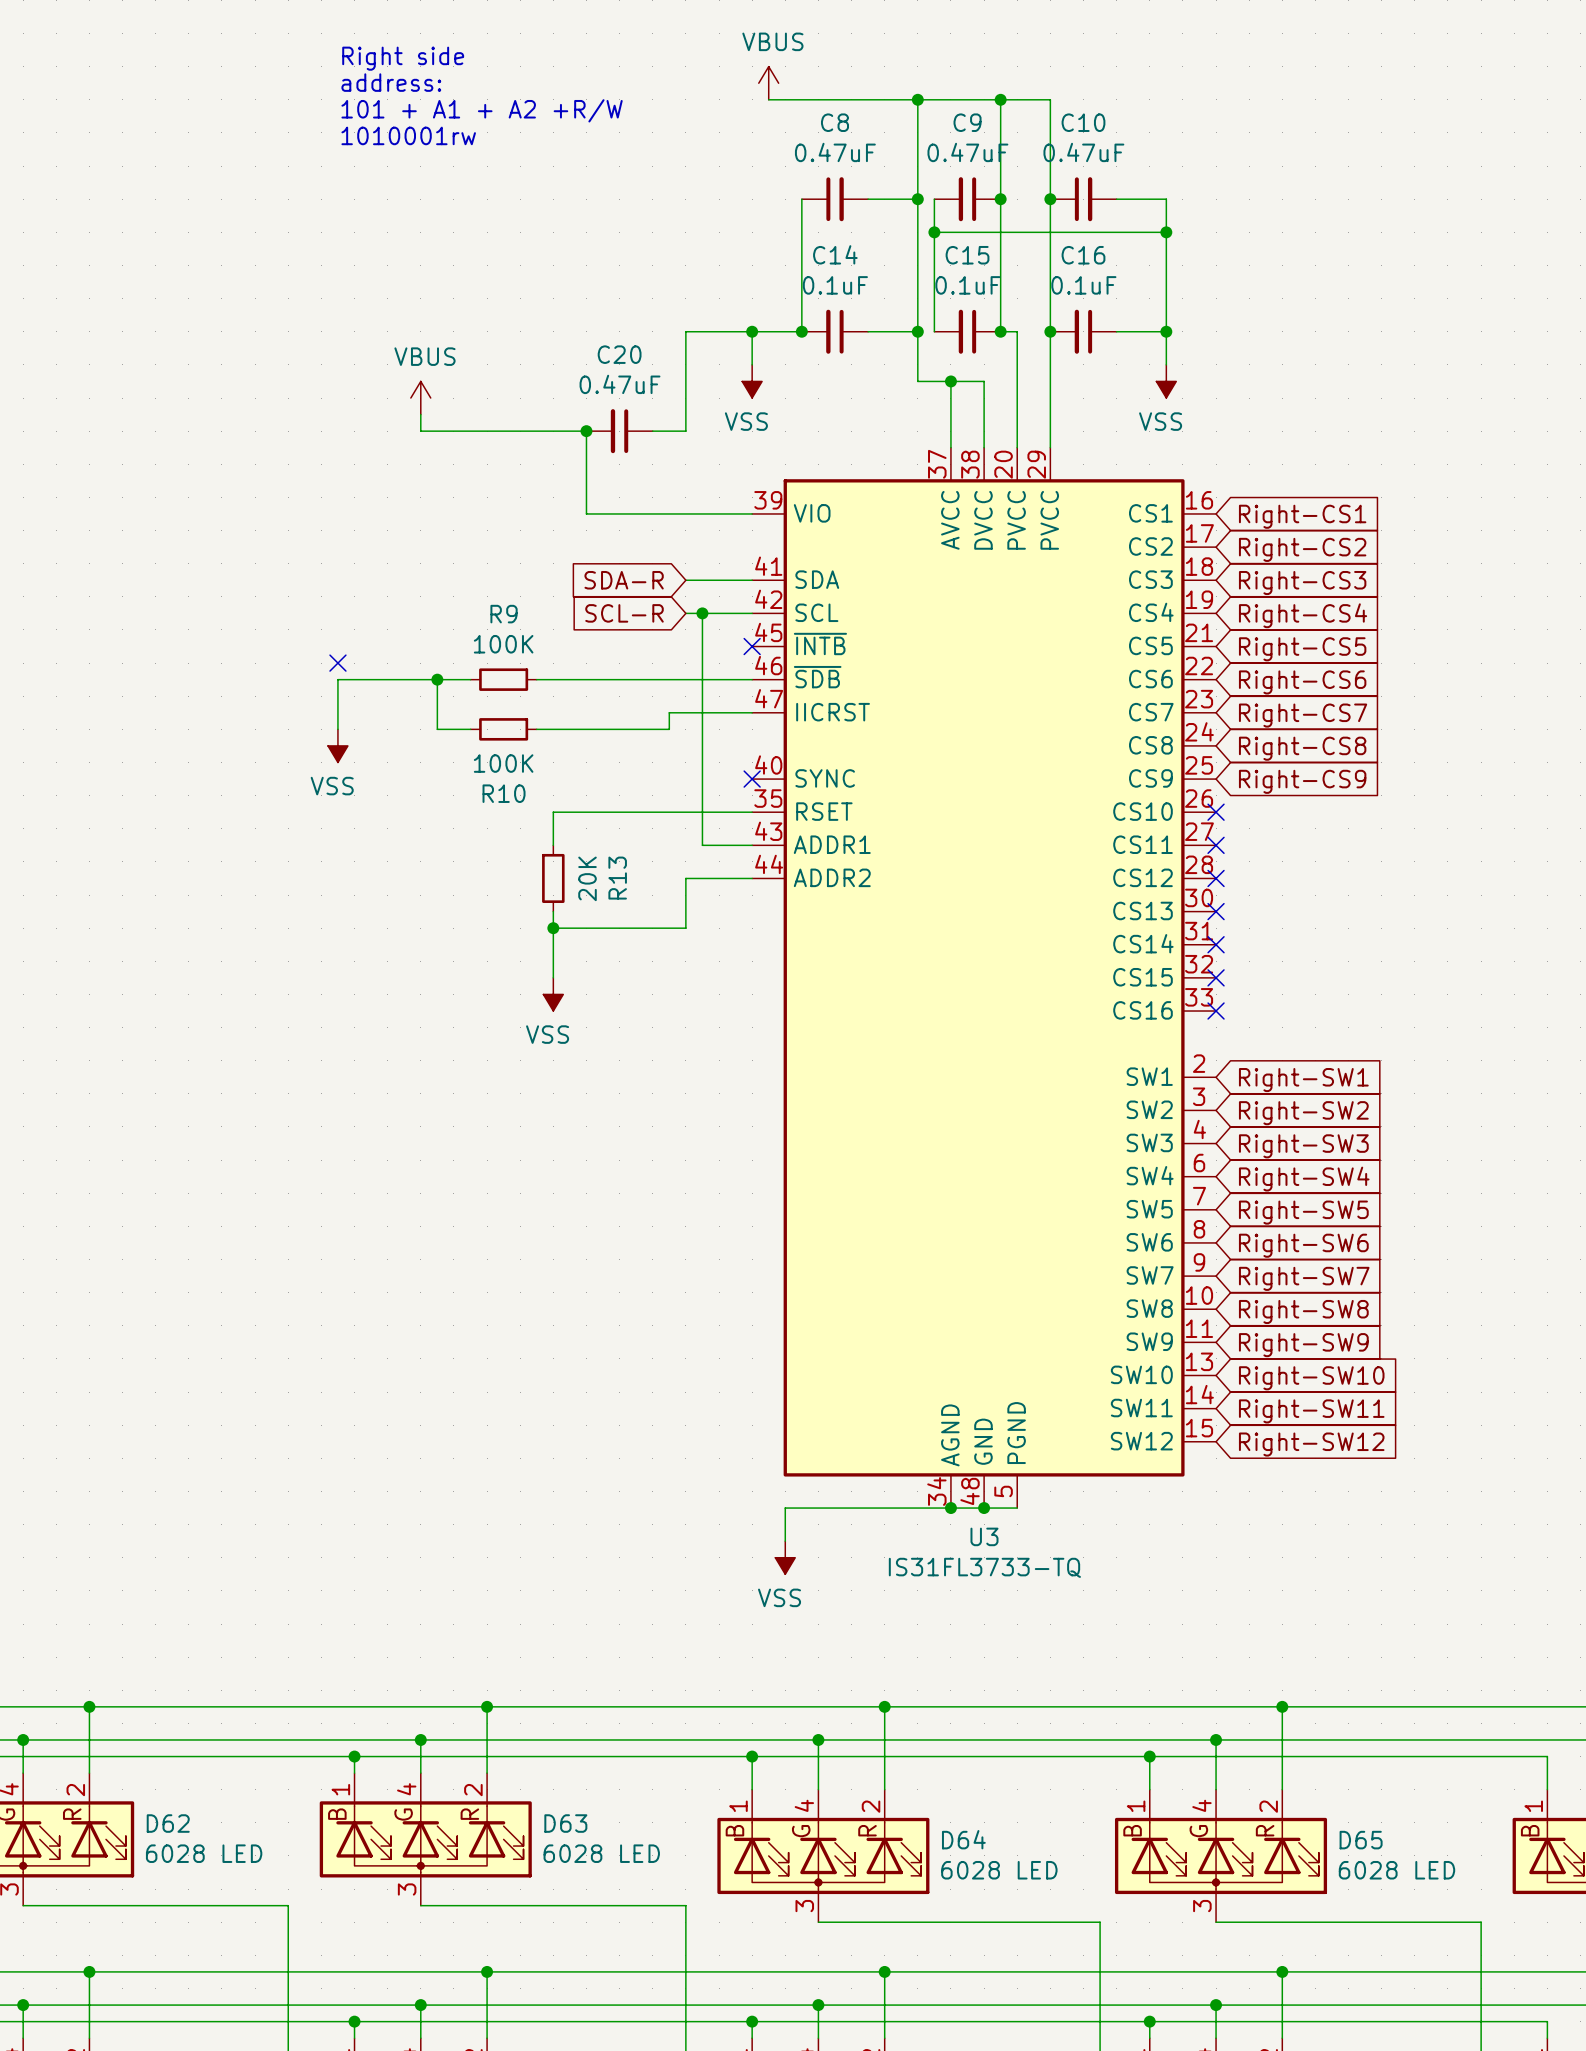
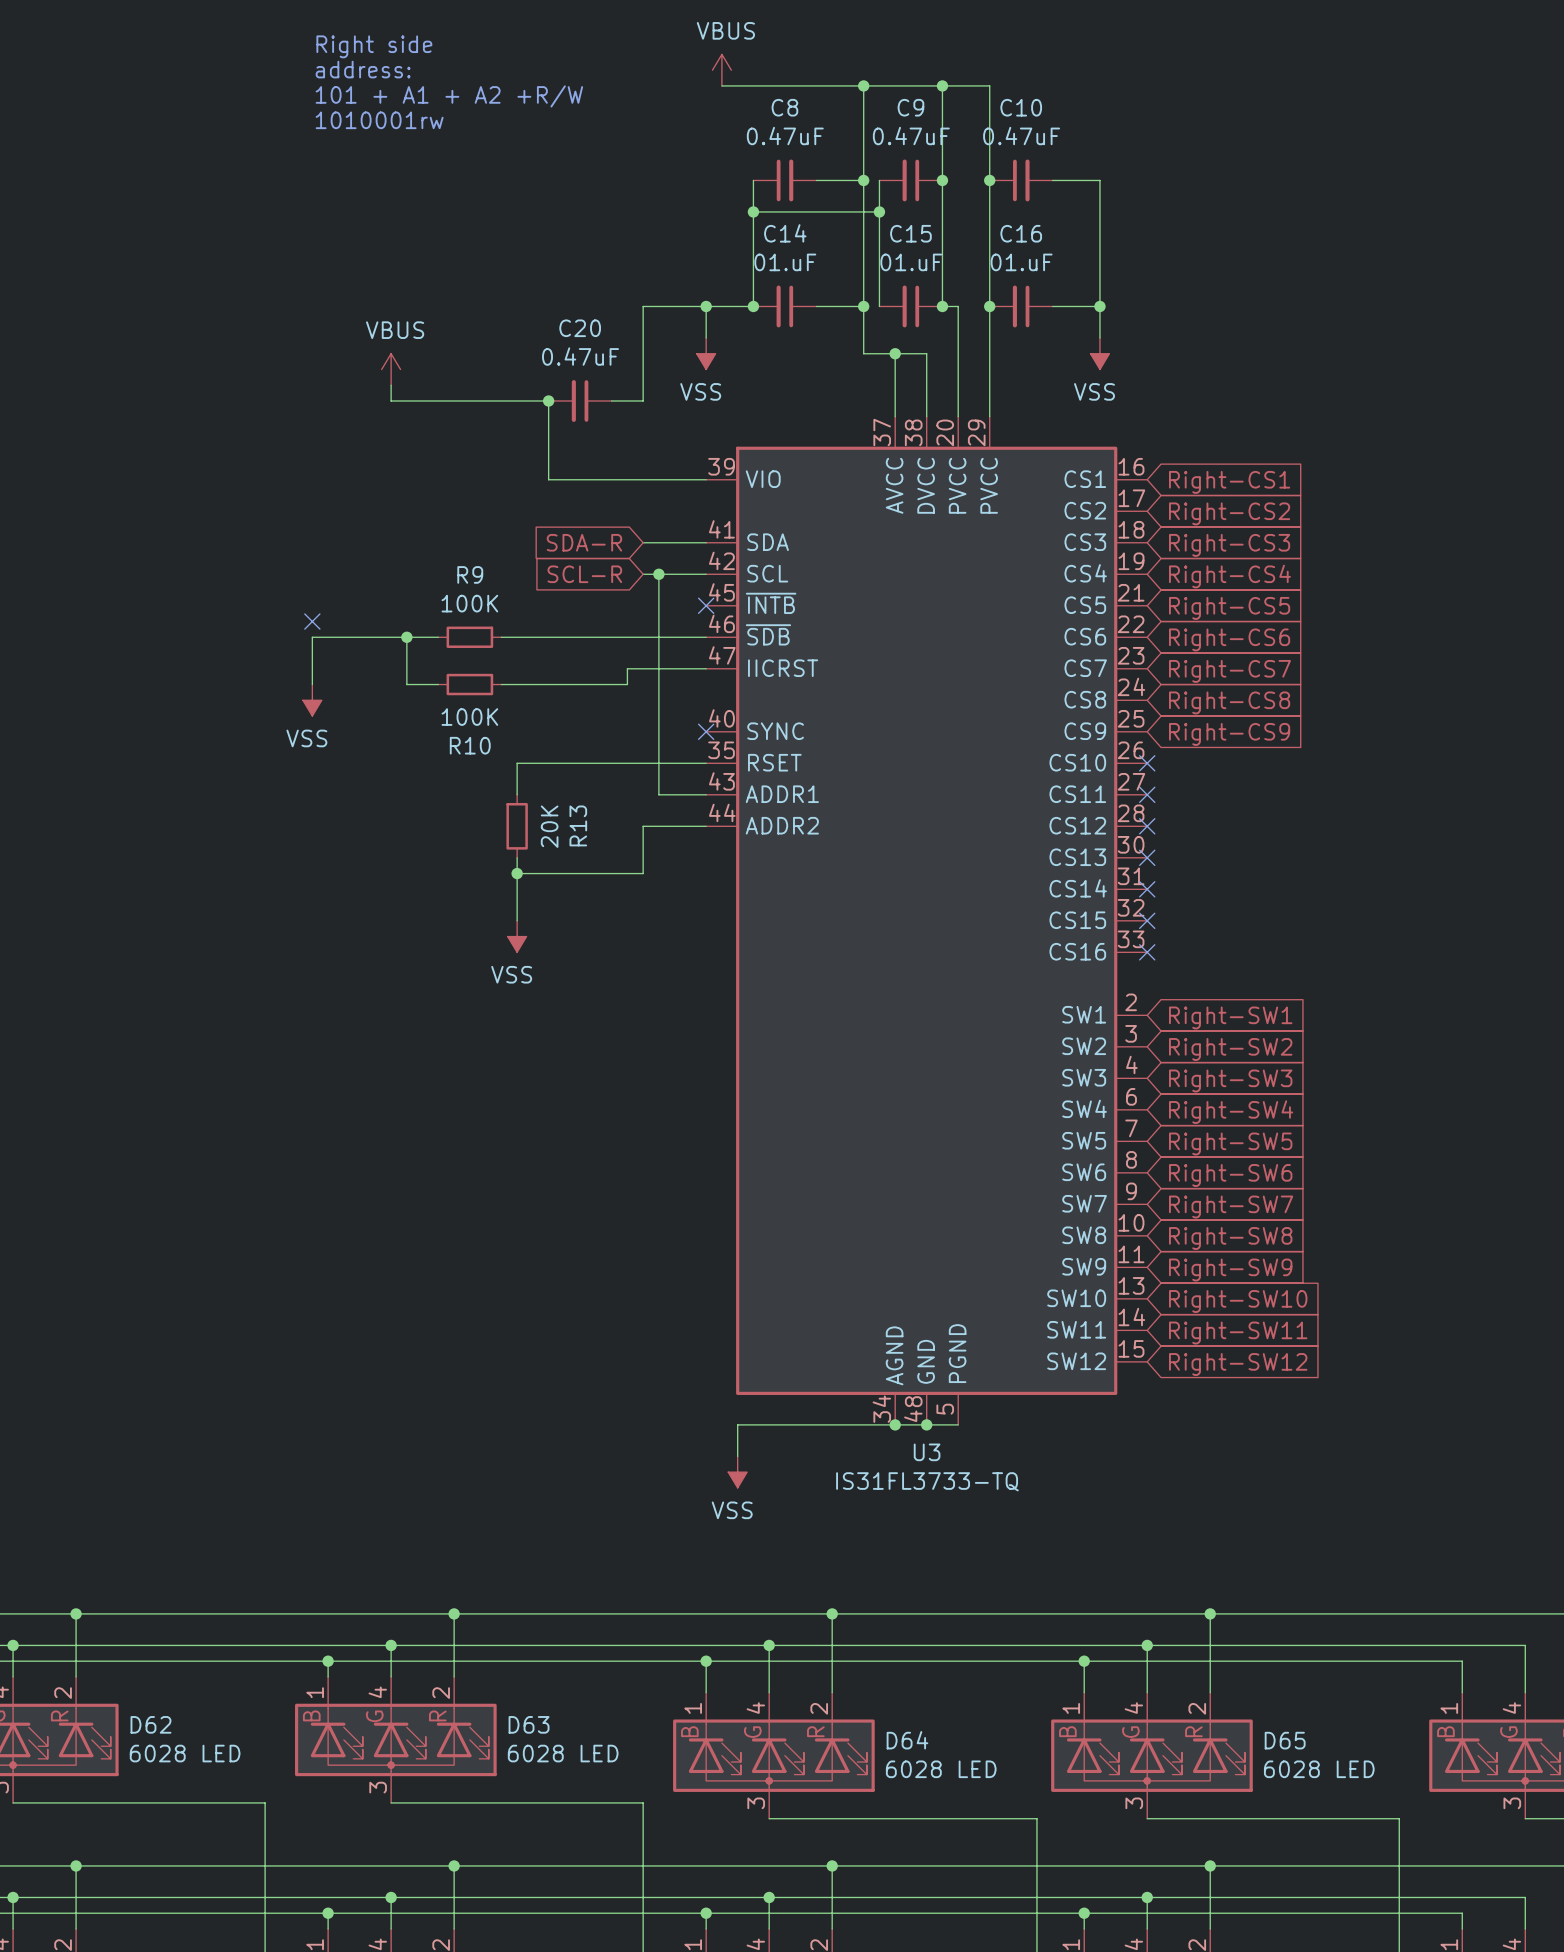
junction: none -> (753, 211)
wire: (934, 232) (1166, 232) -> (879, 211) (753, 211)
junction: (1166, 232) -> none
C14 value: 0.1uF (835, 285) -> 01.uF (785, 262)
C15 value: 0.1uF (967, 285) -> 01.uF (911, 262)
C16 value: 0.1uF (1083, 285) -> 01.uF (1021, 262)

